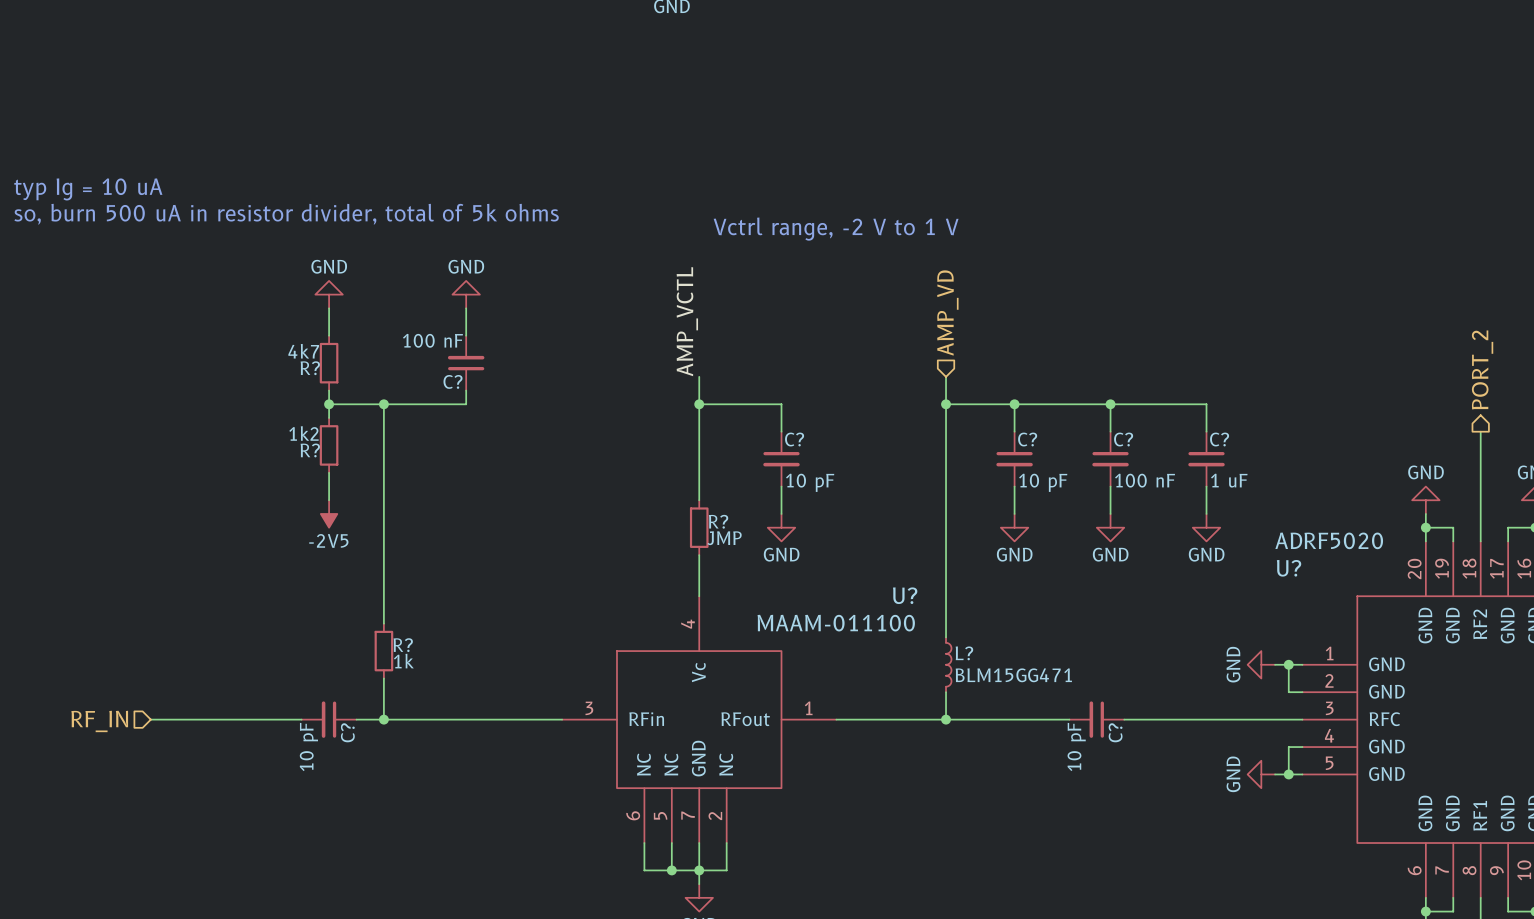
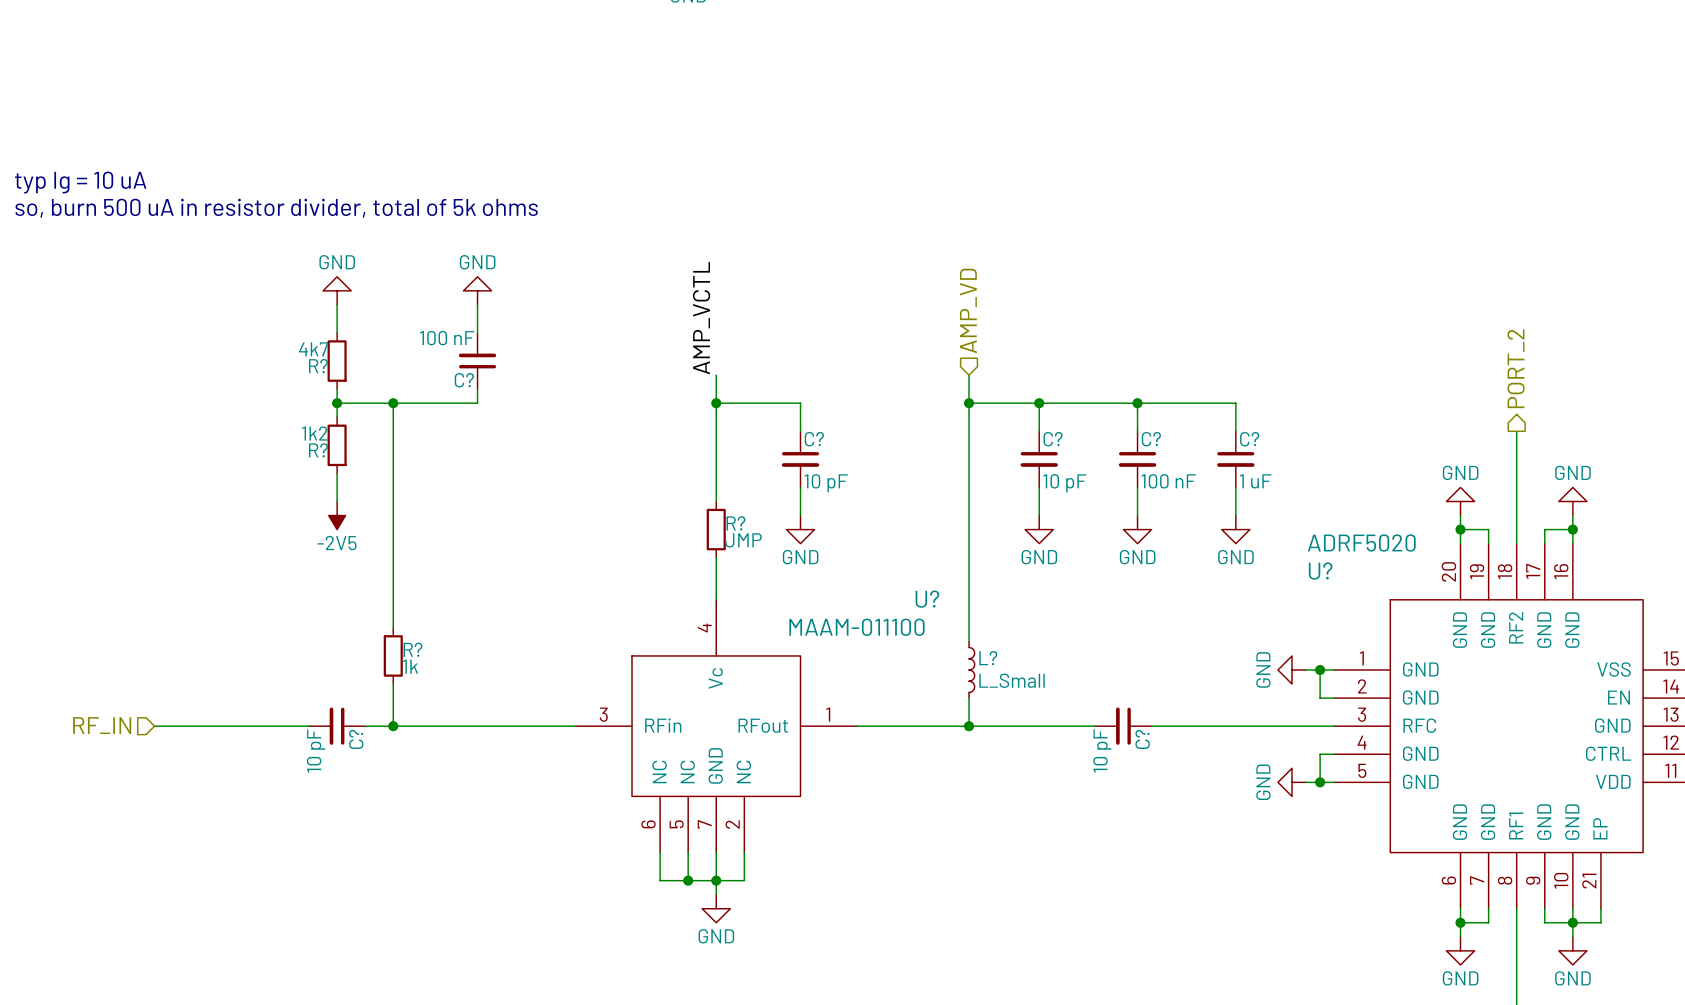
text: Vctrl range, -2 V to 1 V (836, 229) -> none
L? value: BLM15GG471 (1013, 675) -> L_Small (1012, 680)

